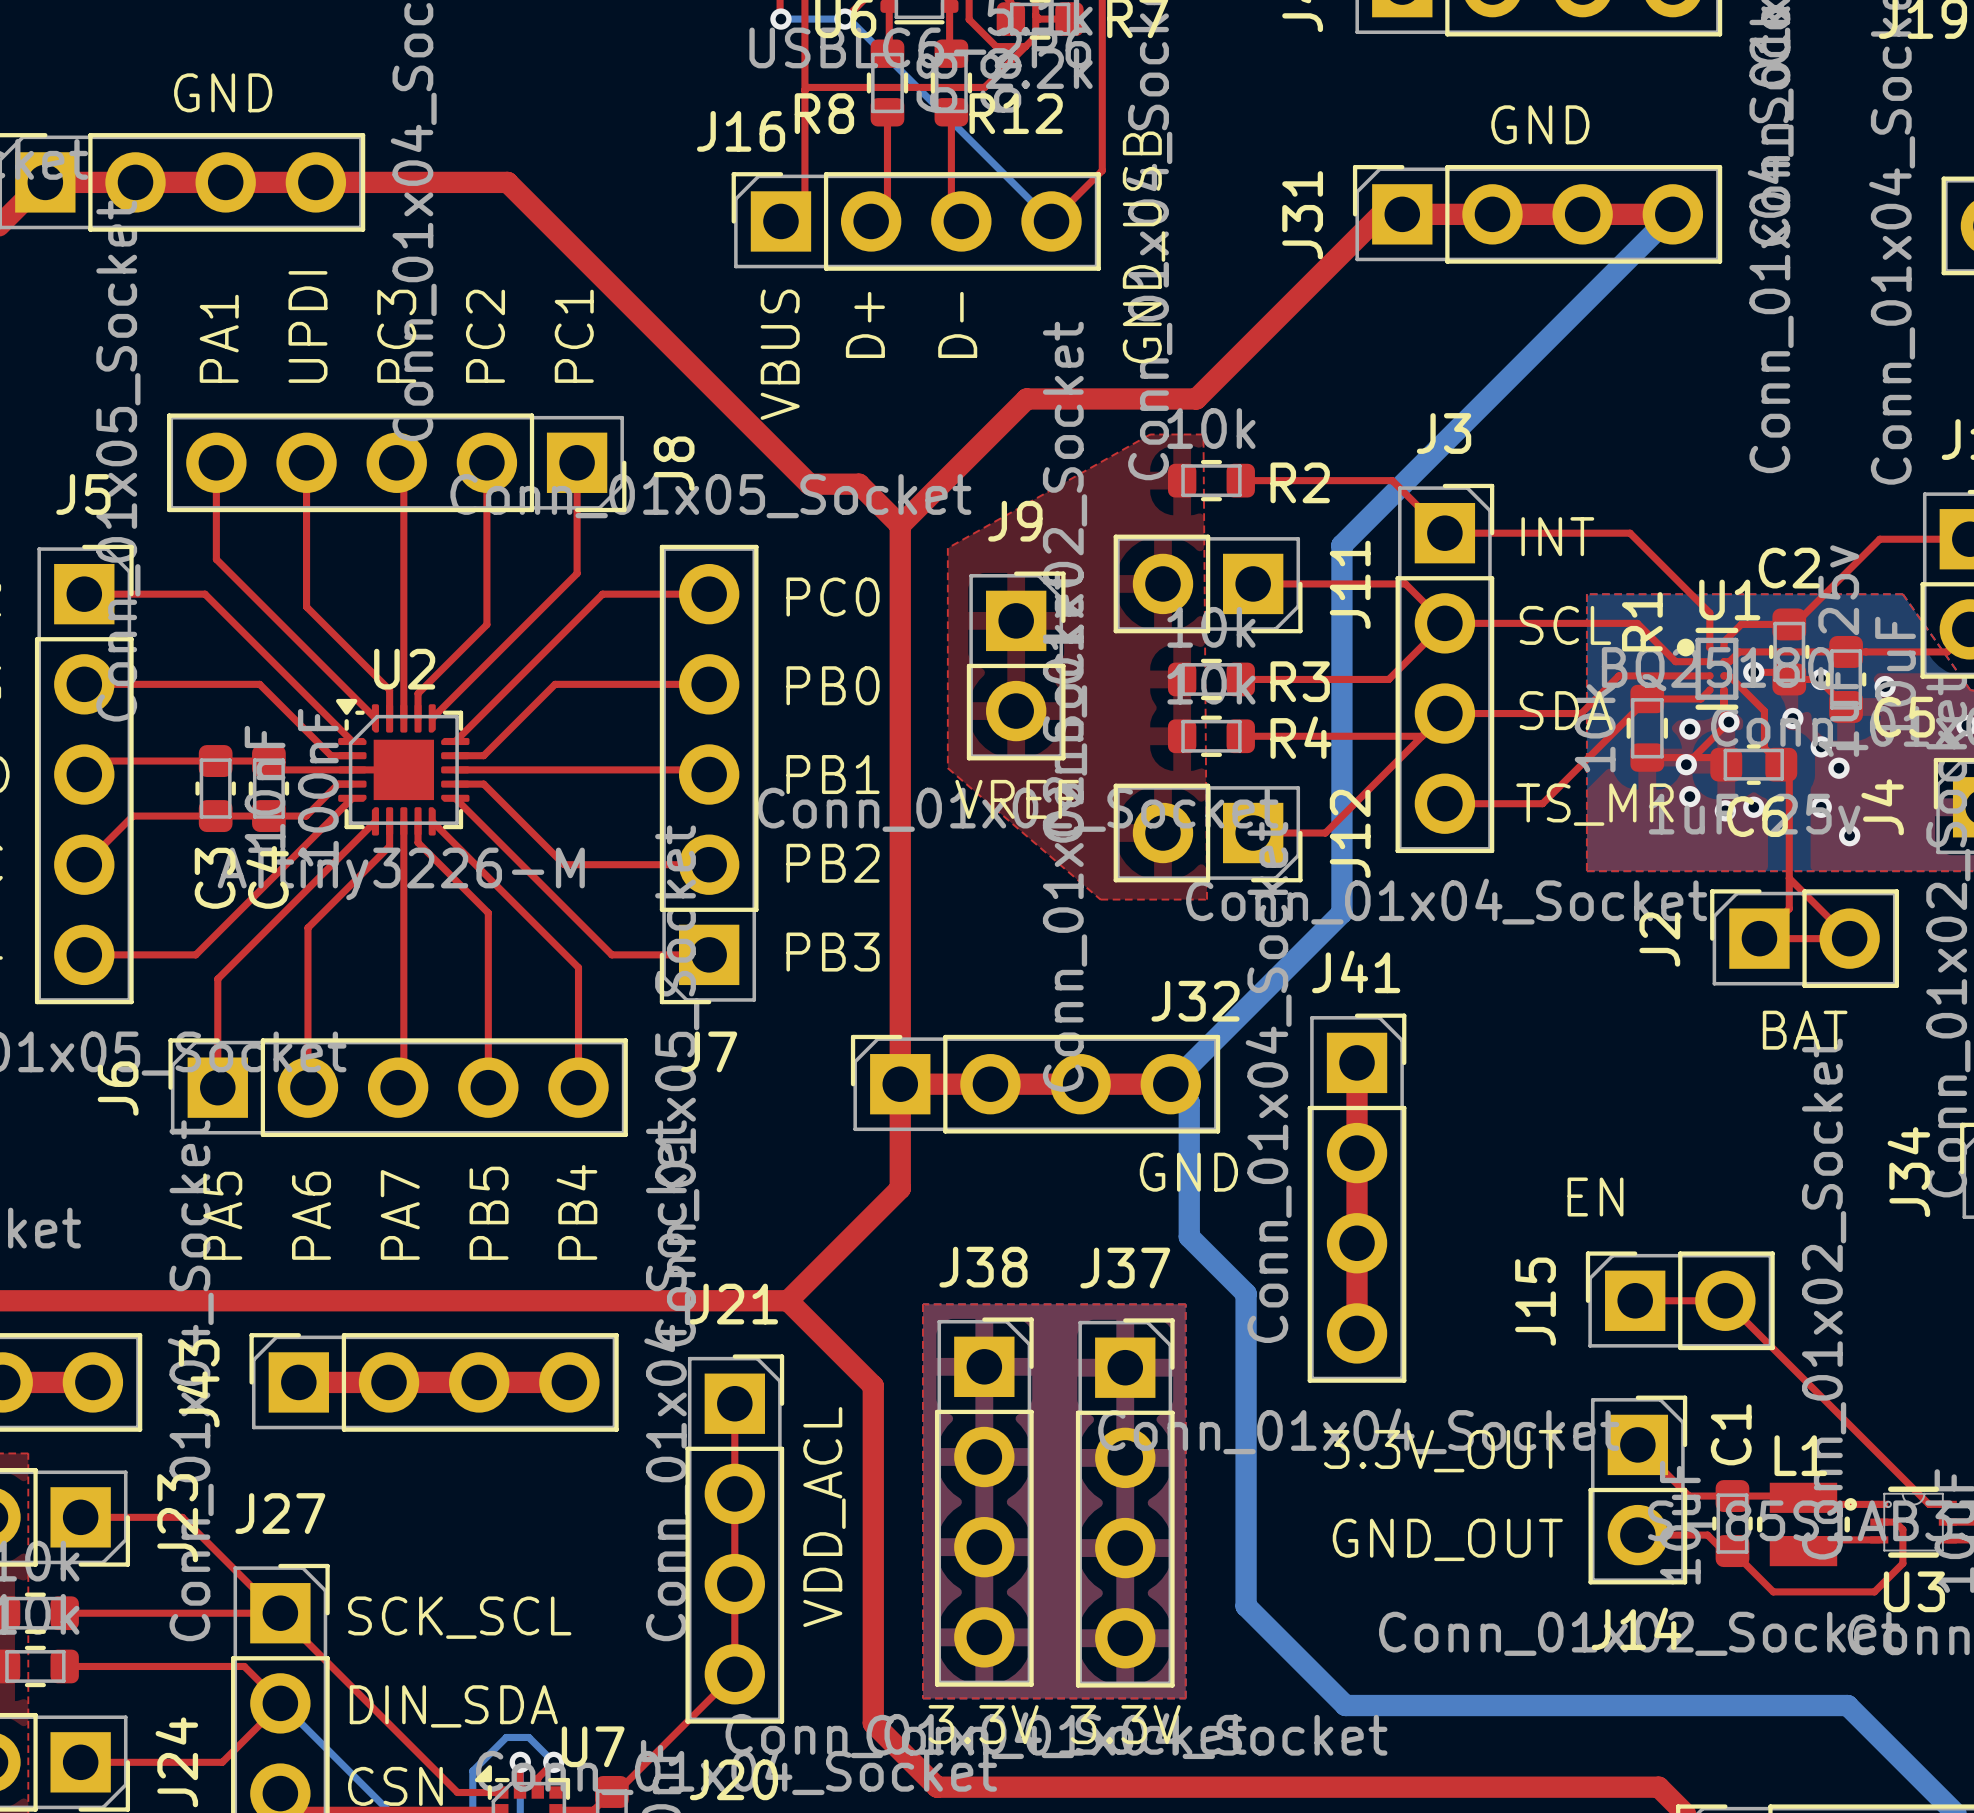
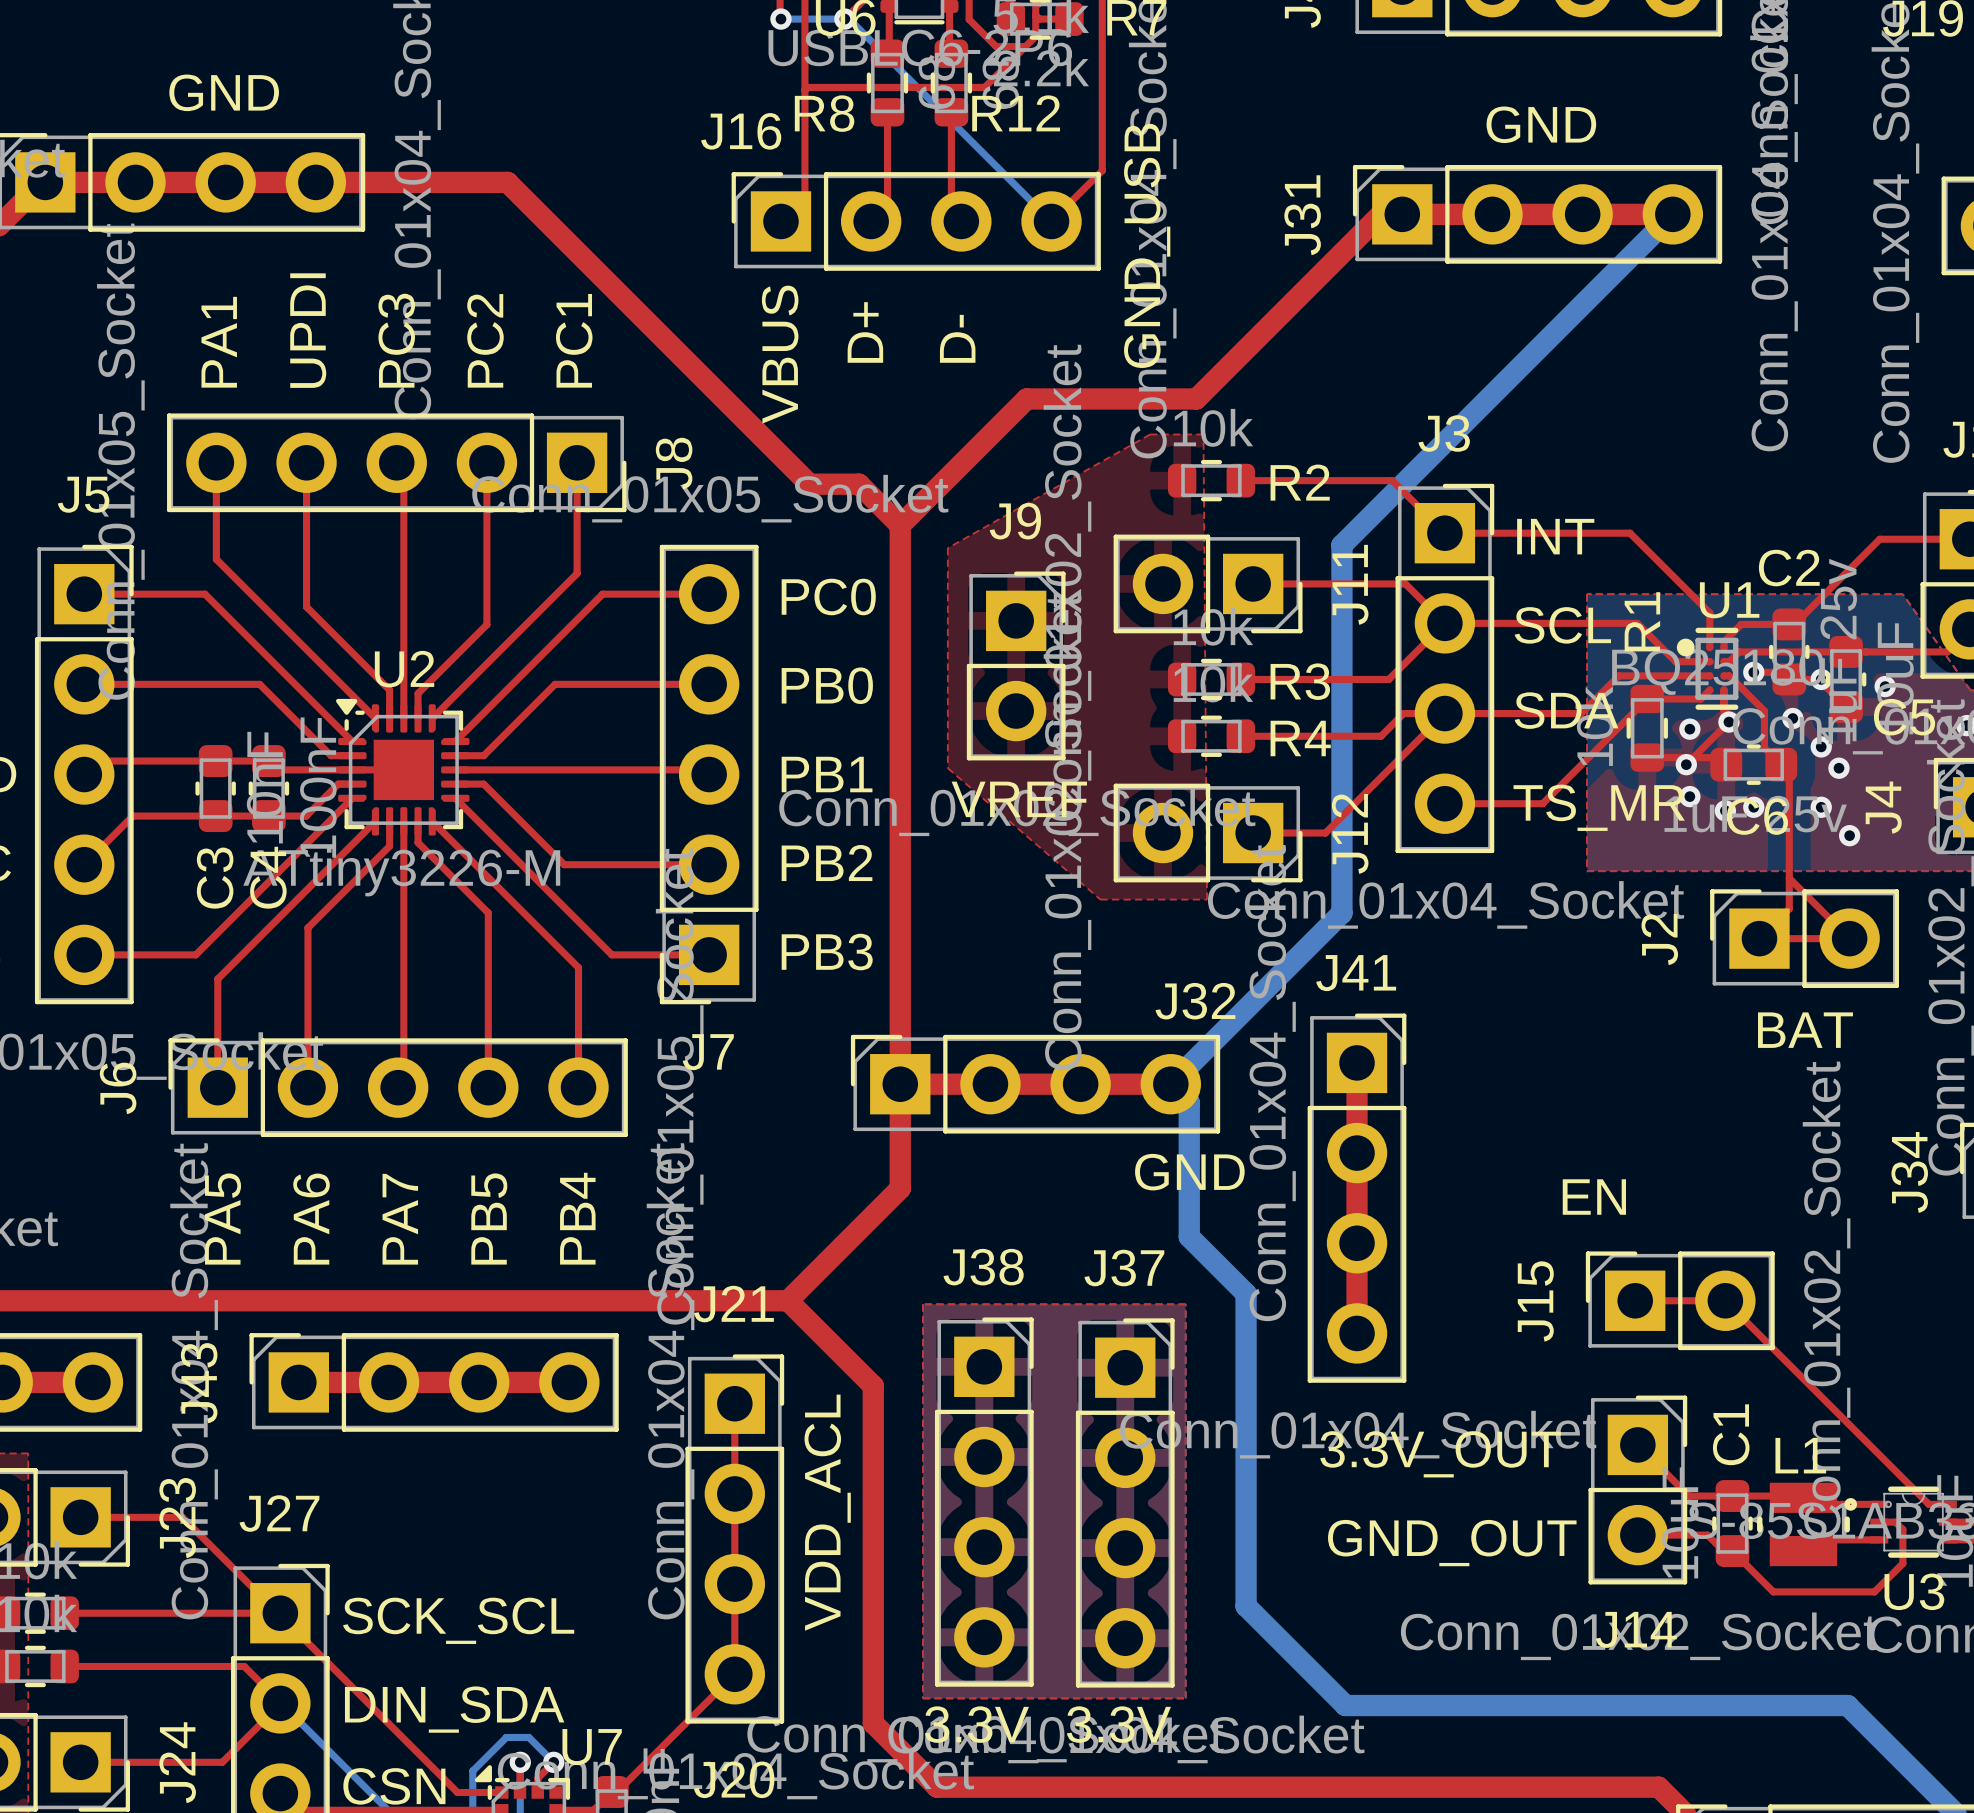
top track: (1380, 736) (1422, 736) -> (1380, 736) (1403, 713) (1444, 713)

